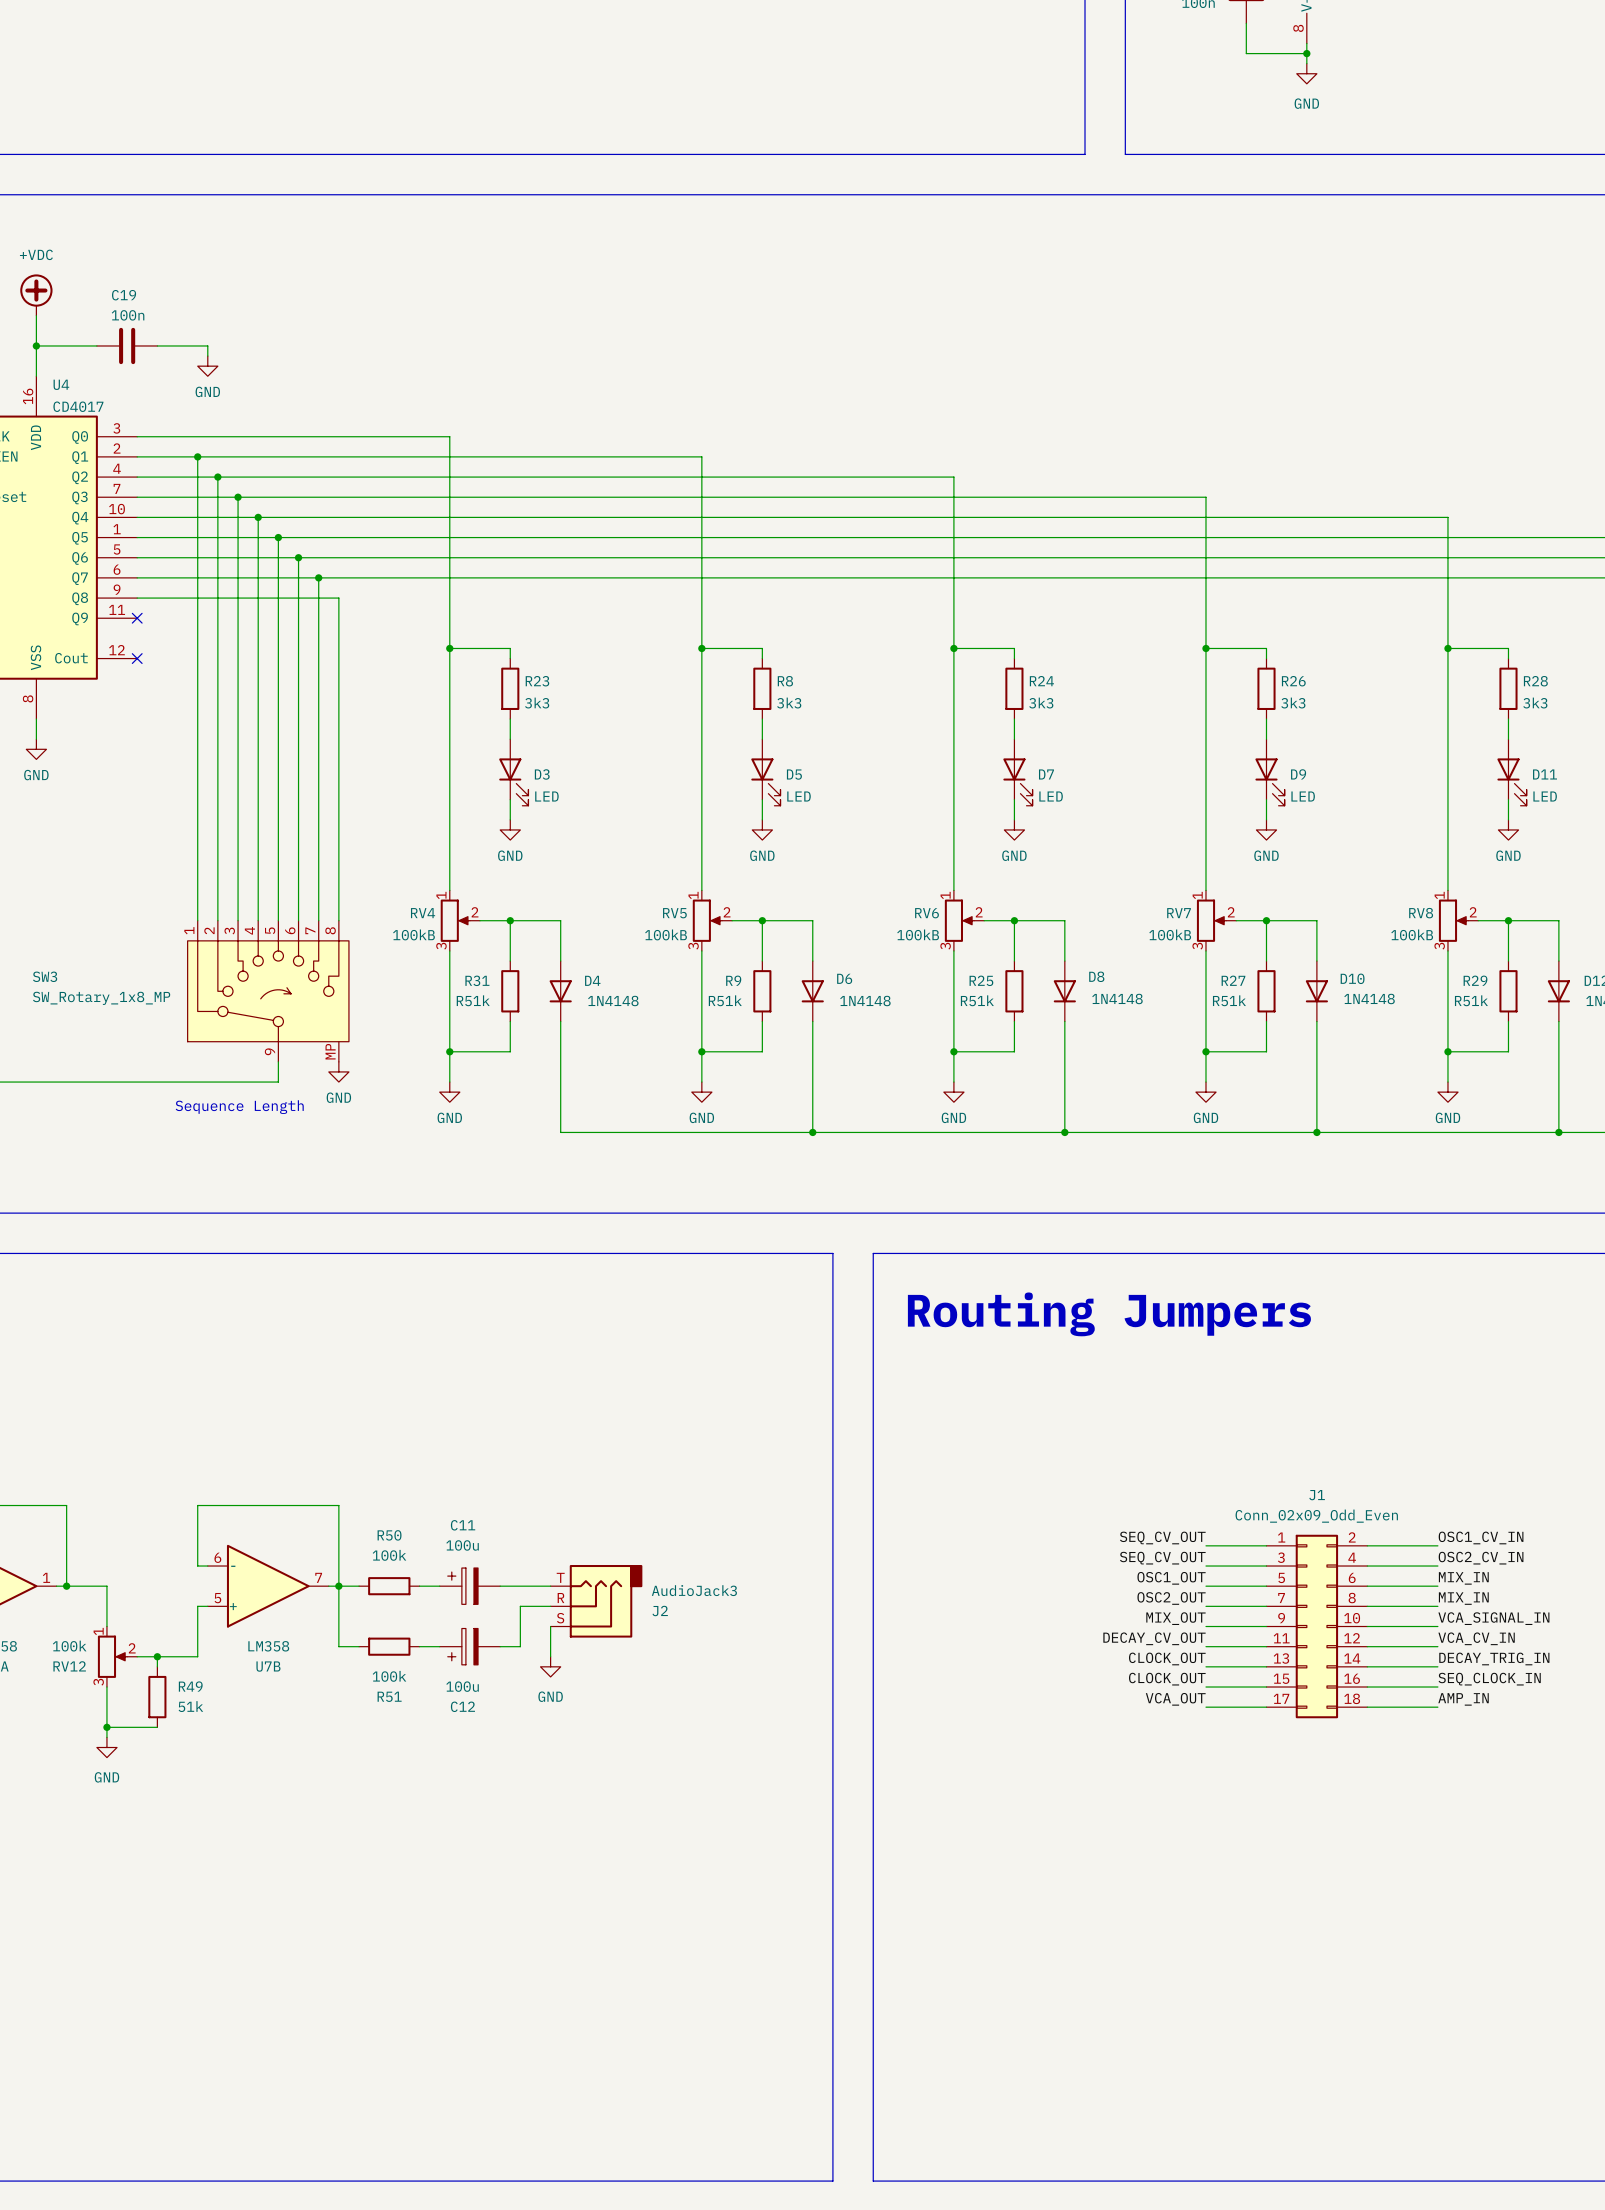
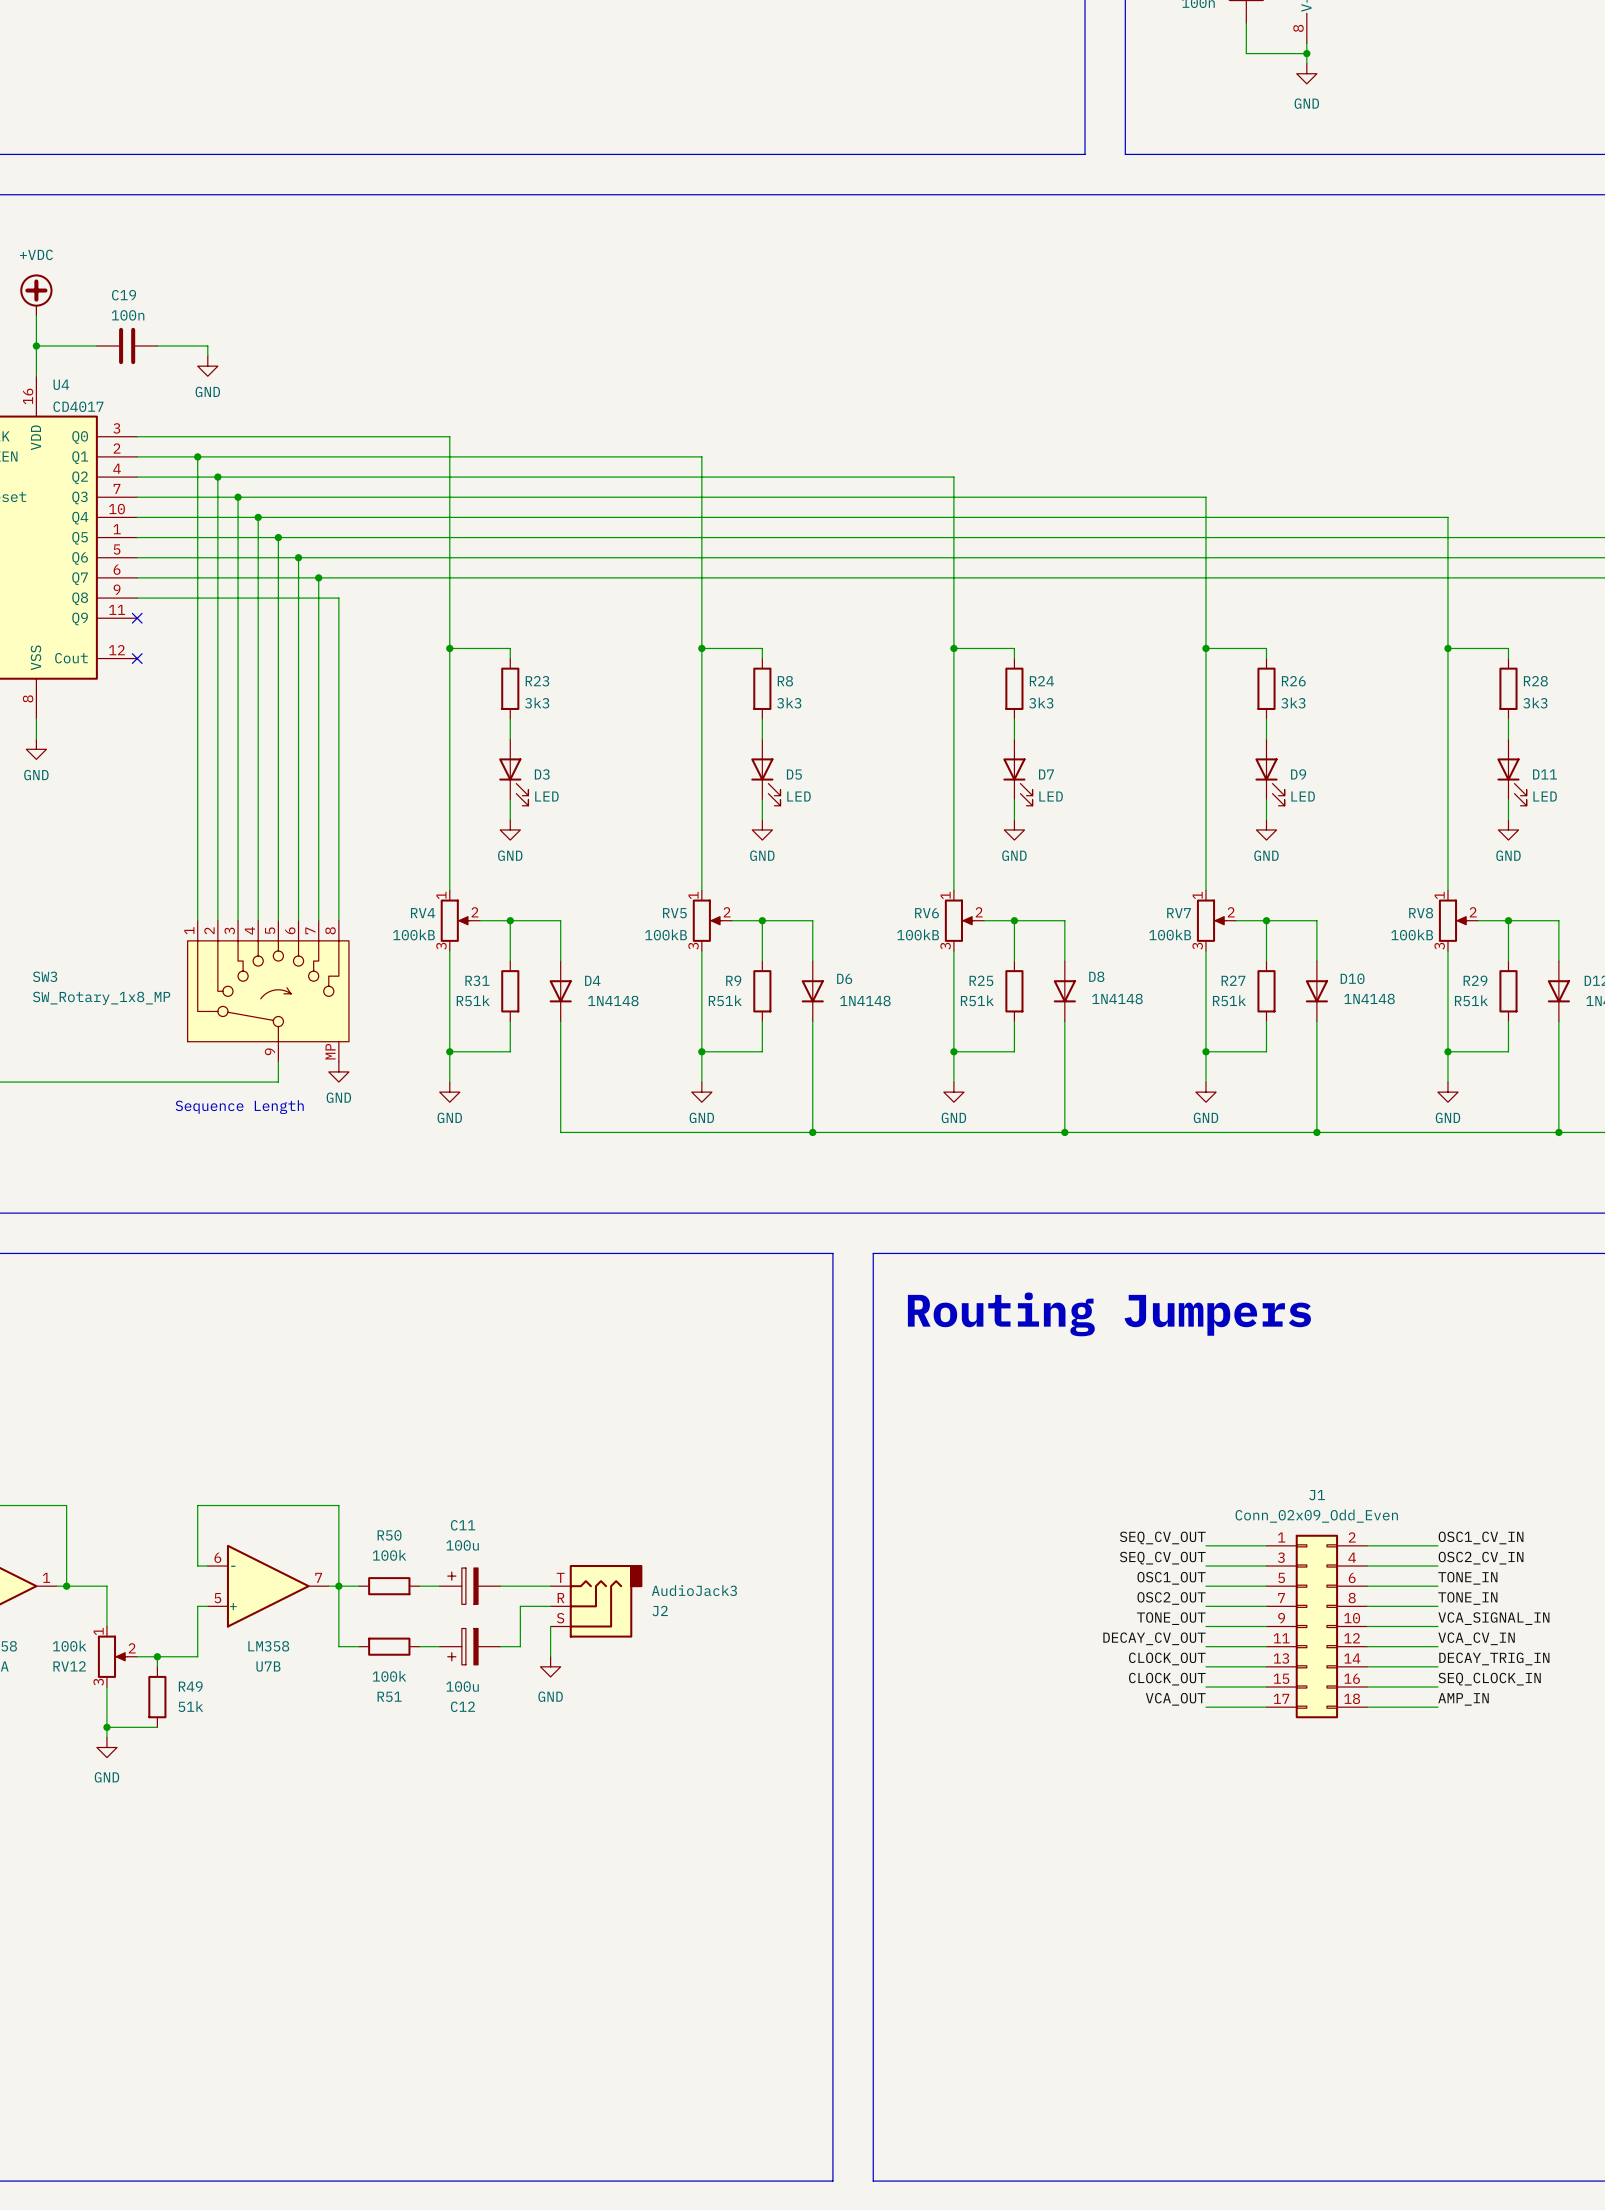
label: MIX_IN (1463, 1578) -> TONE_IN (1467, 1578)
label: MIX_IN (1463, 1598) -> TONE_IN (1467, 1598)
label: MIX_OUT (1175, 1618) -> TONE_OUT (1171, 1618)

